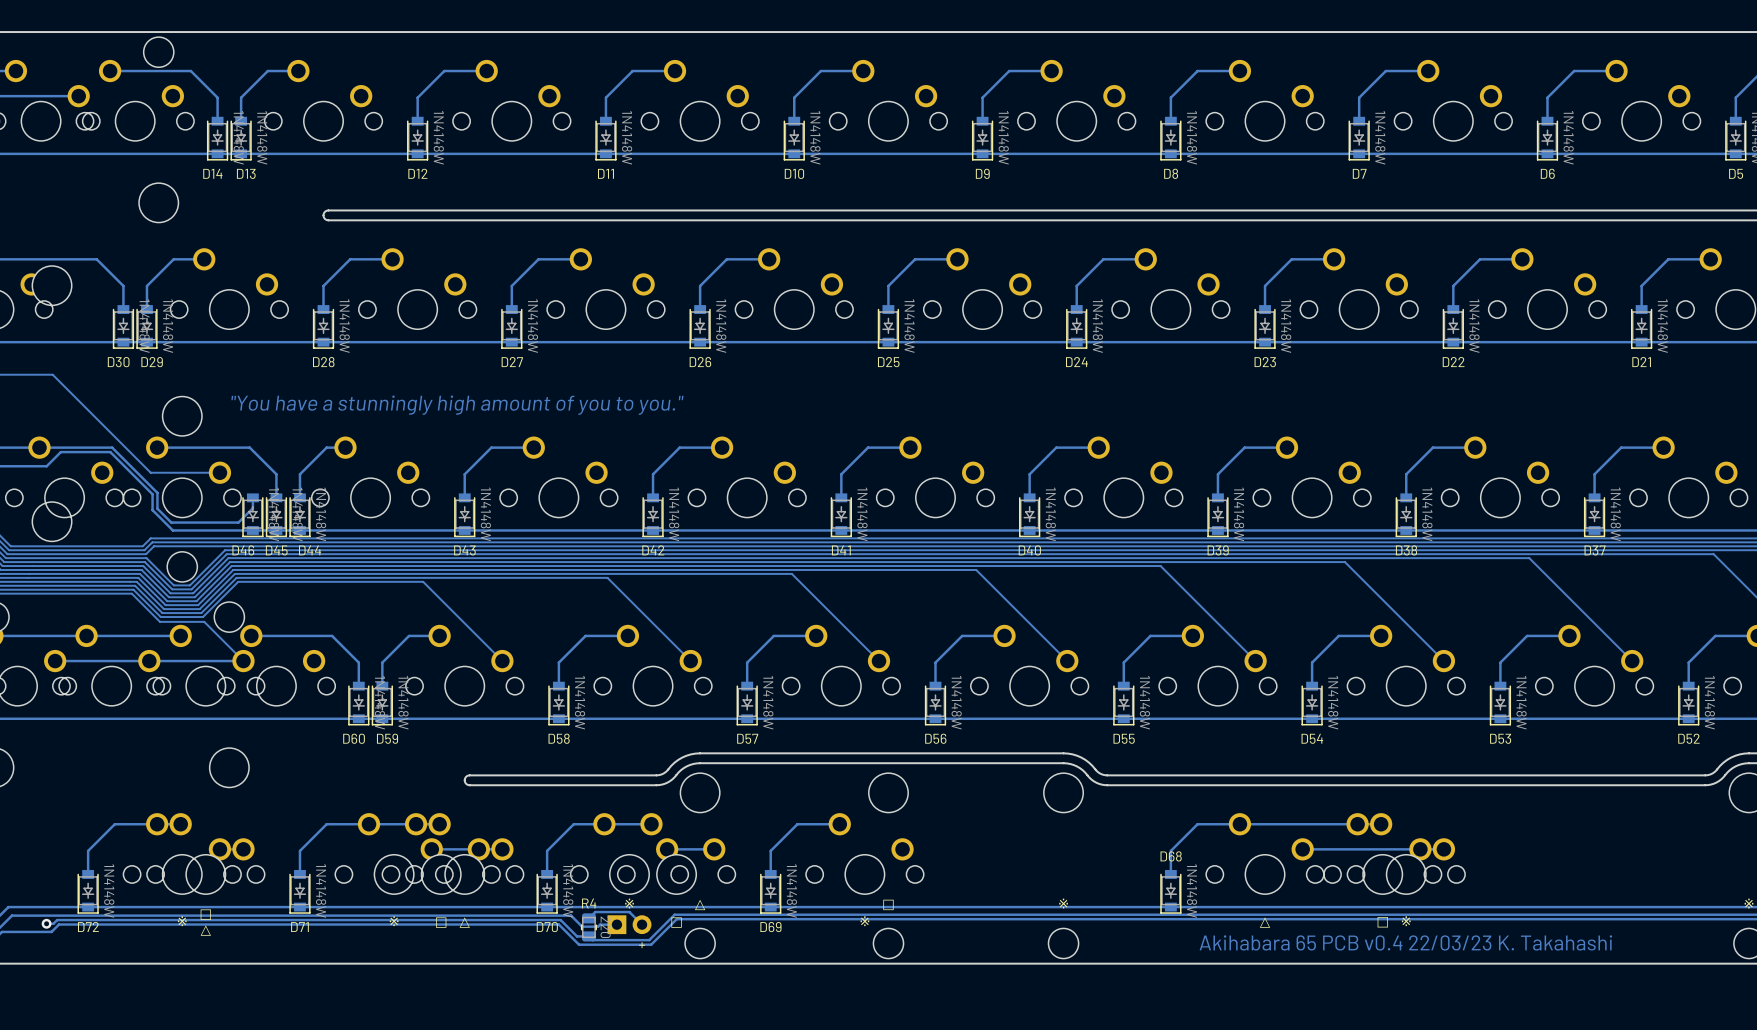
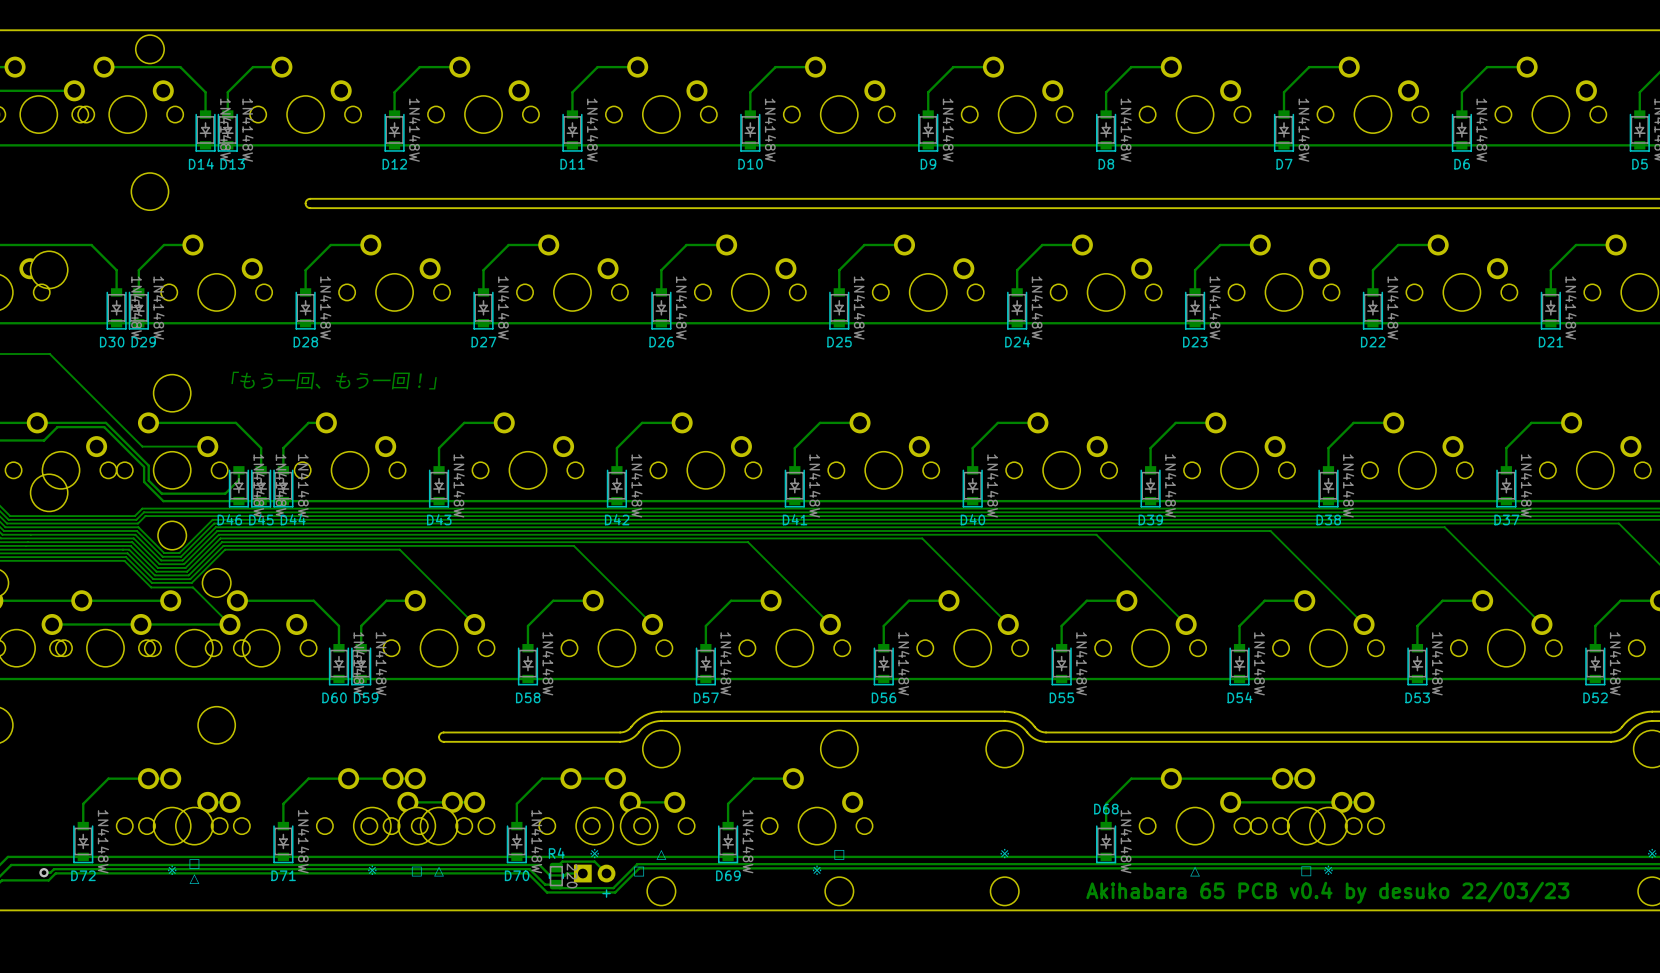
text: "You have a stunningly high amount of you to you." (457, 405) -> 「もう一回、もう一回！」 (334, 380)
text: Akihabara 65 PCB v0.4 22/03/23 K. Takahashi (1405, 942) -> Akihabara 65 PCB v0.4 by desuko 22/03/23 (1327, 892)

